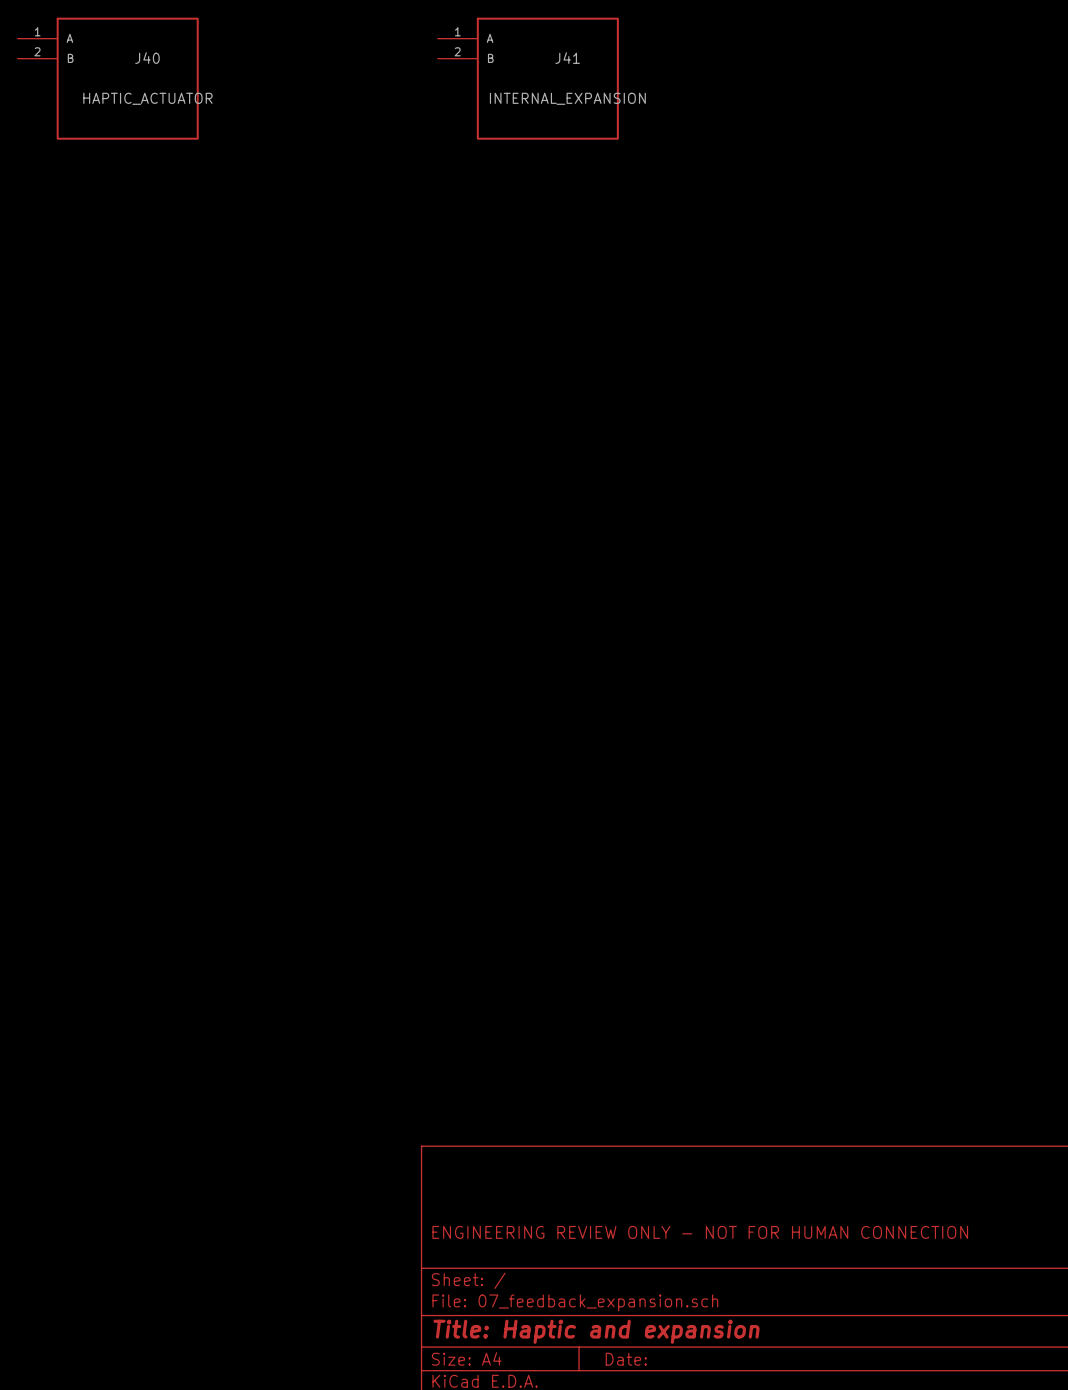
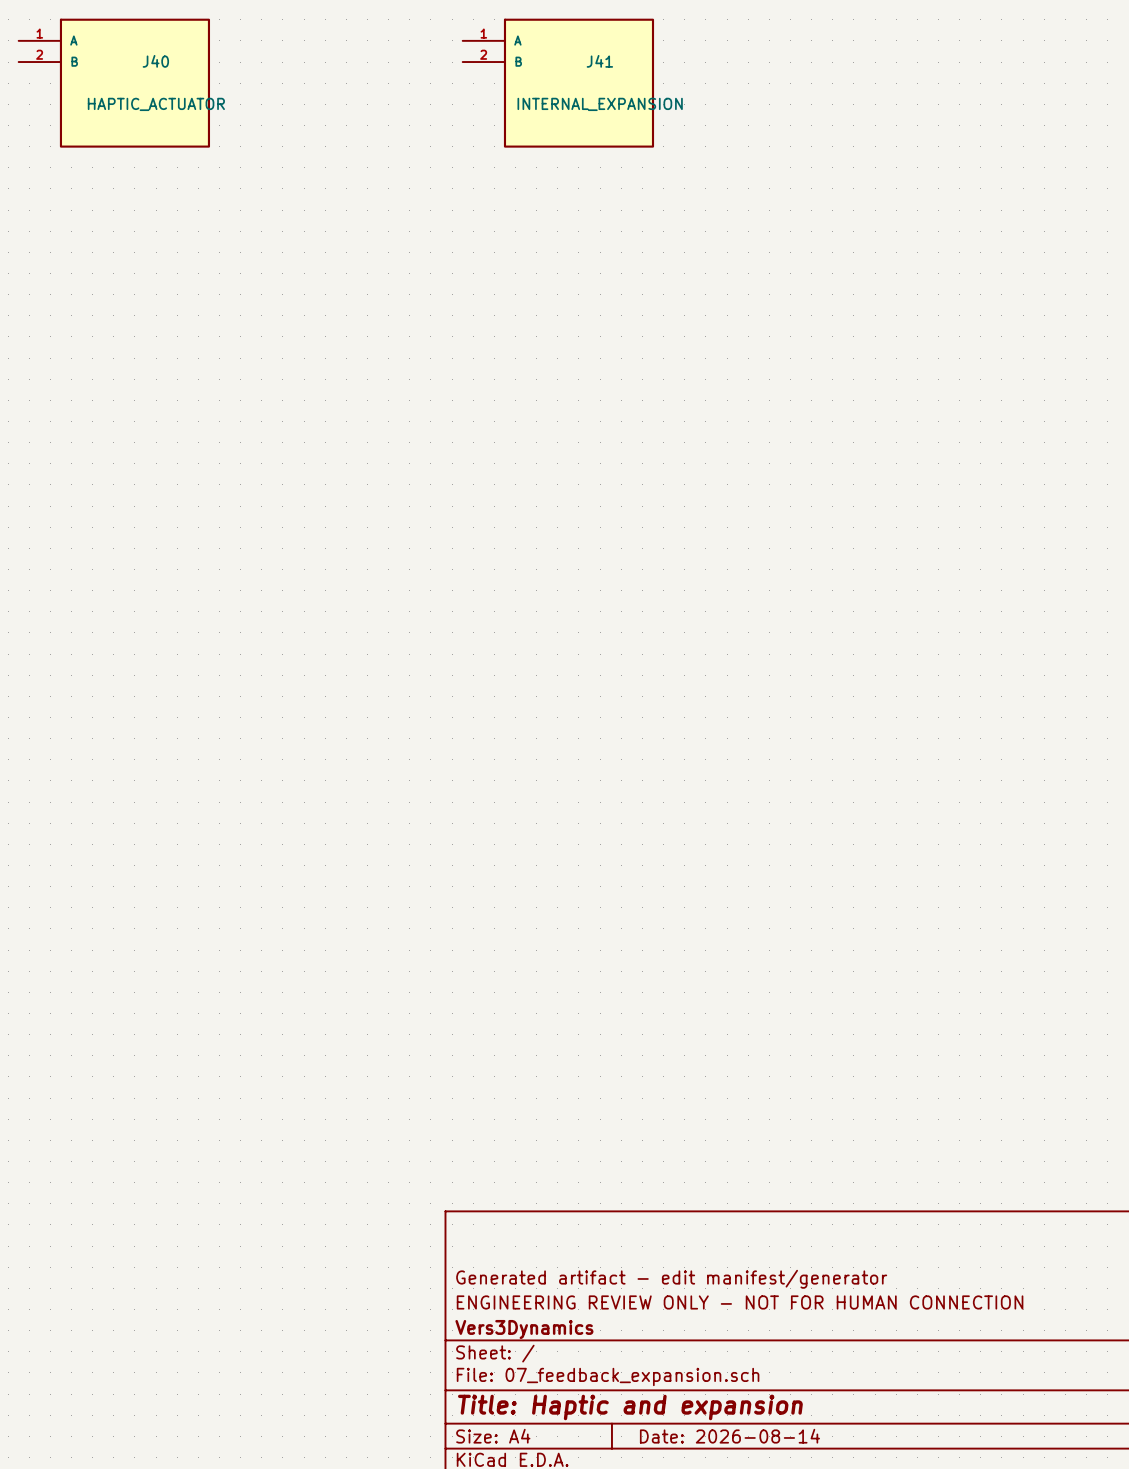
title block: none -> Generated artifact - edit manifest/generator (671, 1279)
title block: none -> Vers3Dynamics (524, 1329)
title block: Date: (626, 1359) -> Date: 2026-08-14 (729, 1436)

